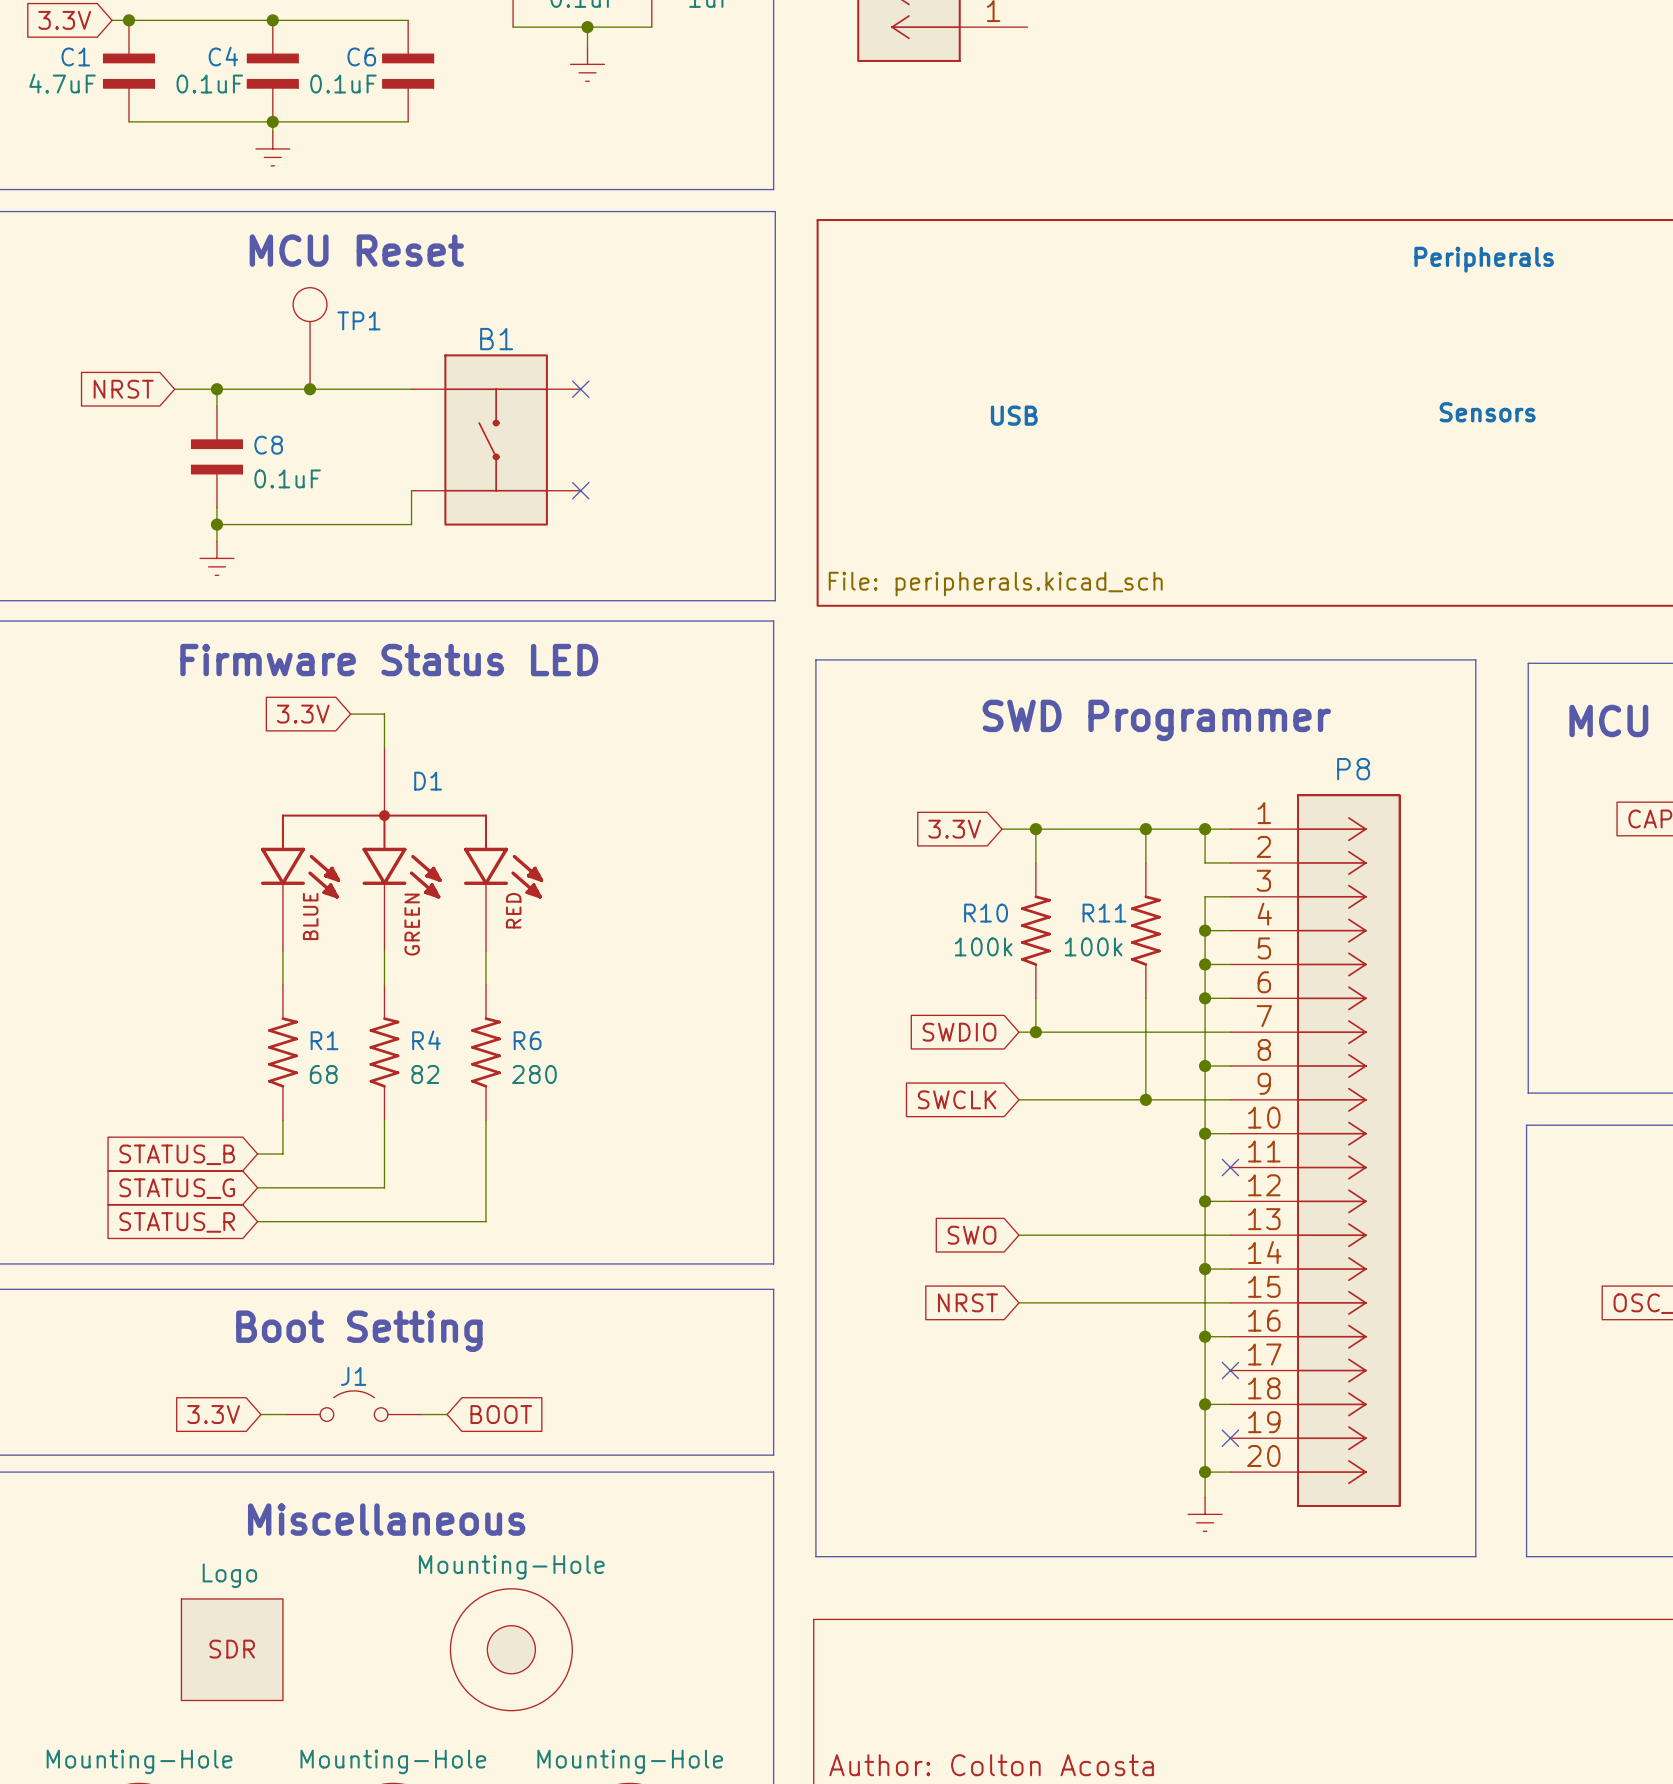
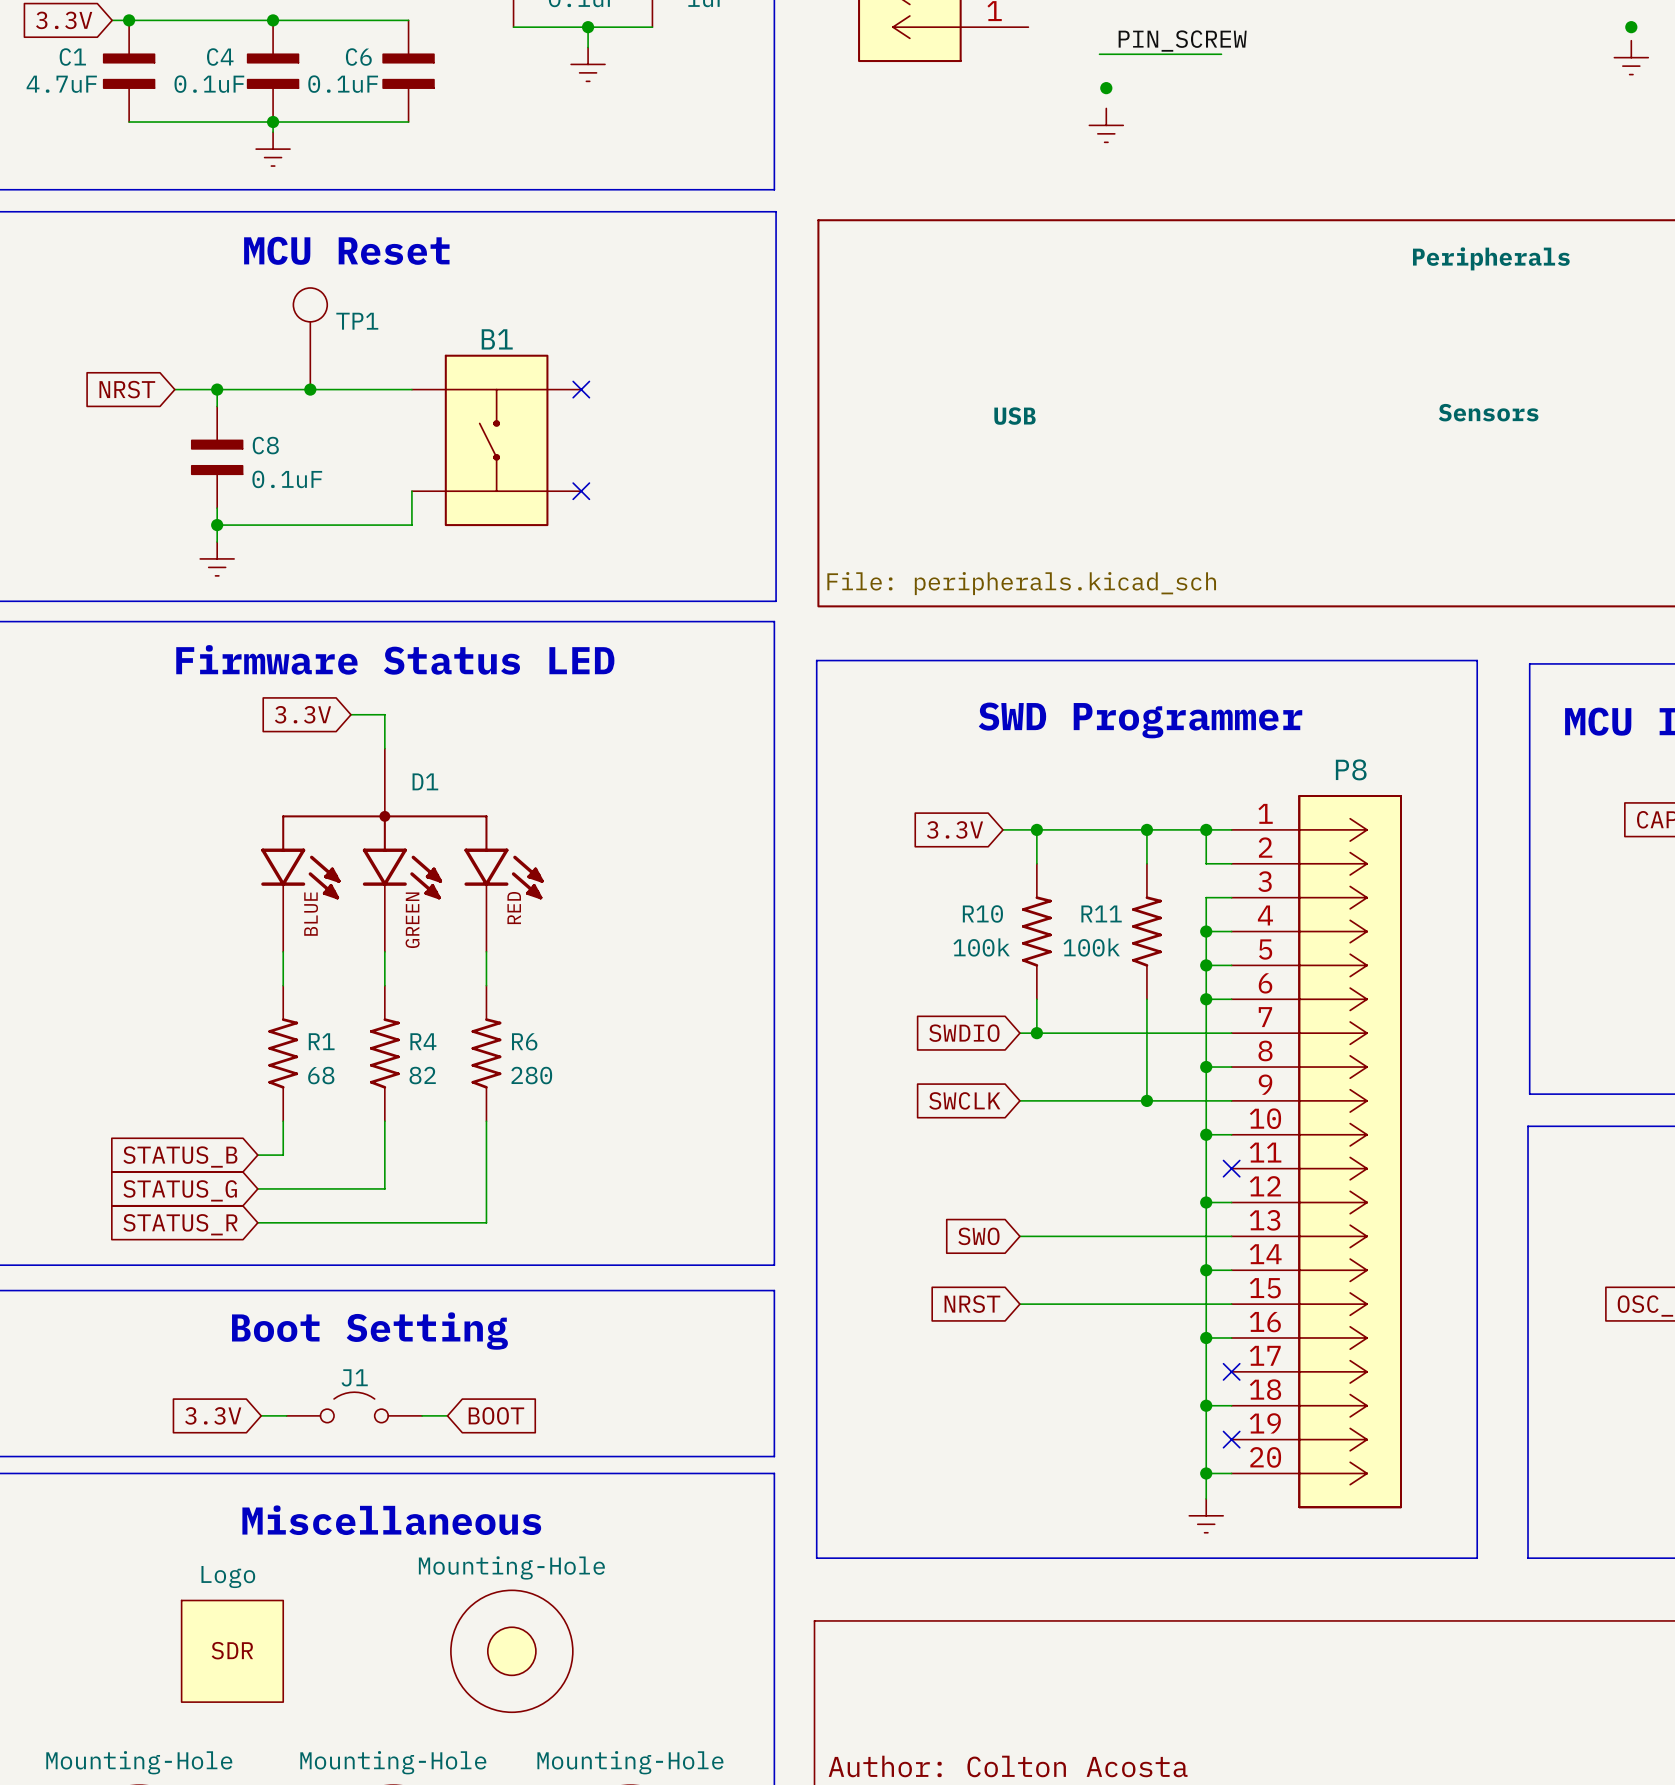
junction: none -> (1631, 27)
label: none -> PIN_SCREW (1182, 41)
wire: none -> (1099, 54) (1221, 54)
power symbol: none -> (1631, 57)
junction: none -> (1106, 88)
power symbol: none -> (1106, 125)

